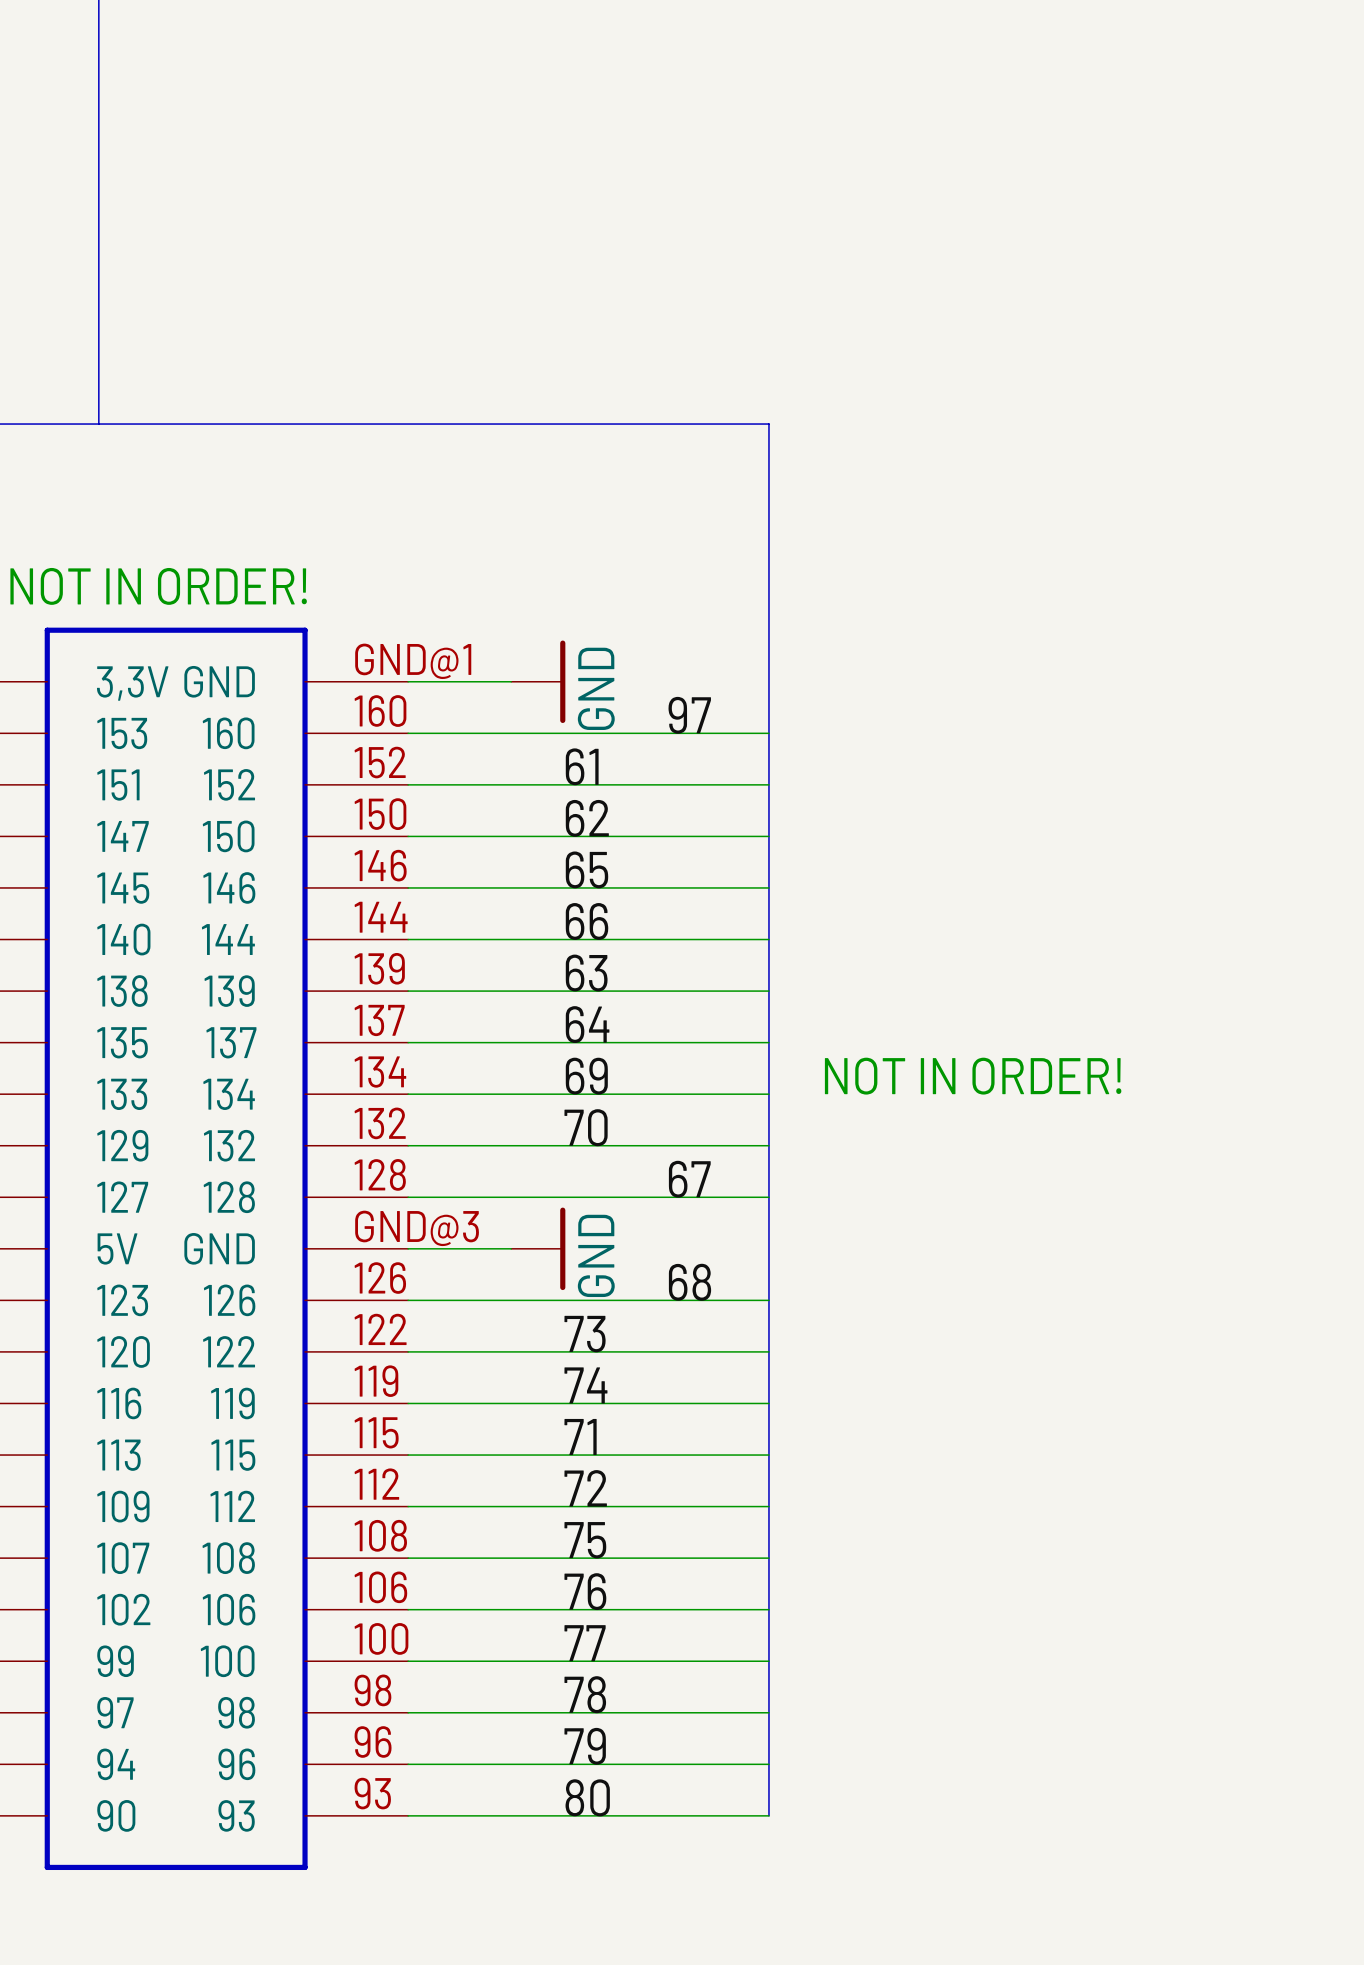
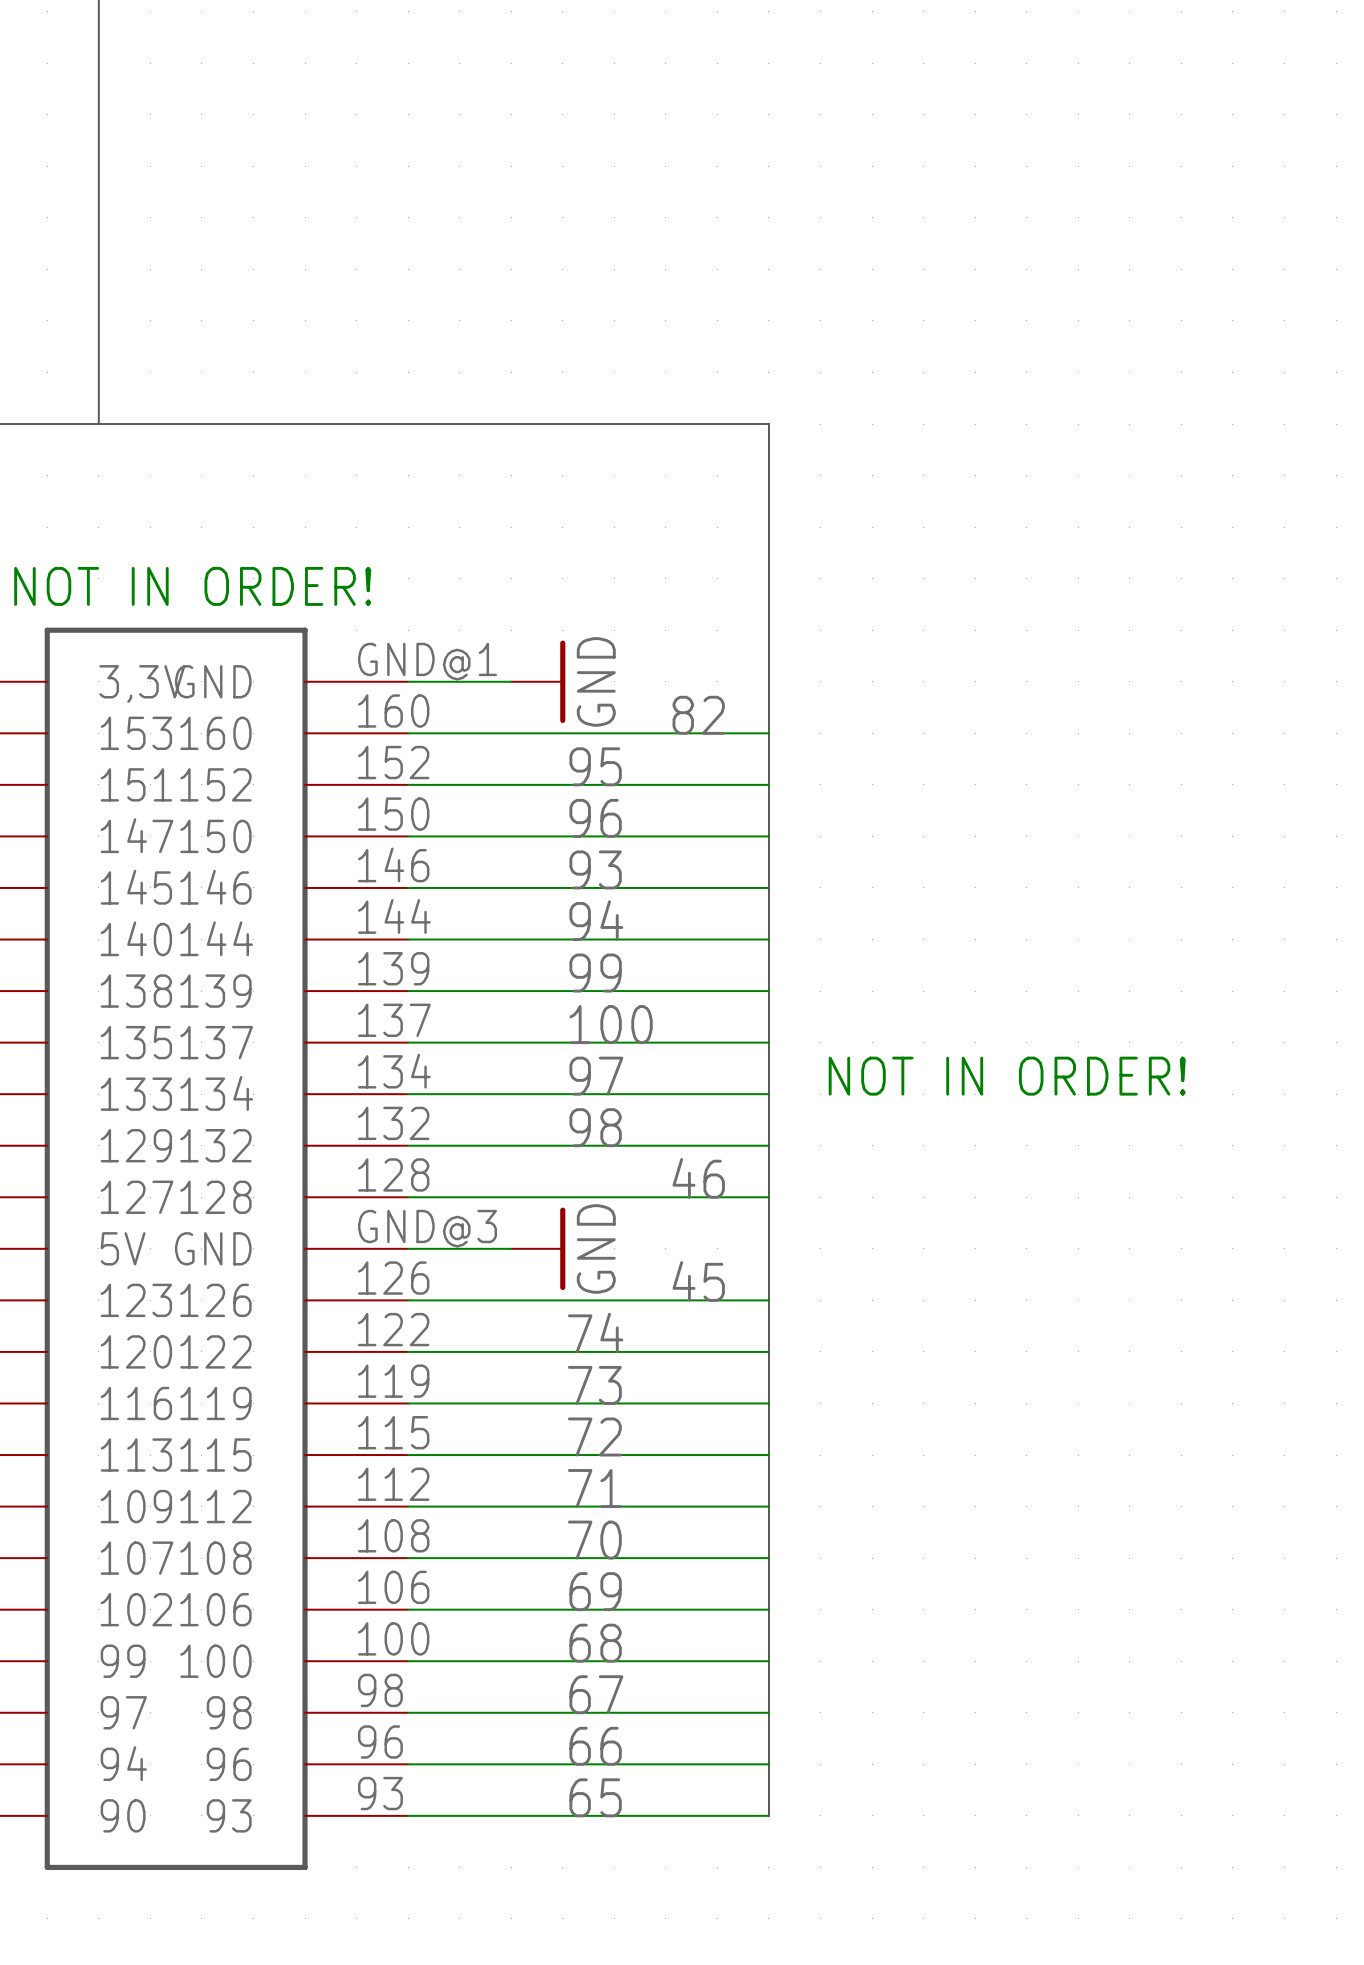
label: 97 (689, 715) -> 82 (698, 715)
label: 61 (582, 766) -> 95 (595, 766)
label: 62 (587, 818) -> 96 (595, 818)
label: 65 (587, 869) -> 93 (595, 869)
label: 66 (587, 921) -> 94 (596, 920)
label: 63 (586, 973) -> 99 (595, 973)
label: 64 (587, 1024) -> 100 (611, 1024)
label: 69 (586, 1076) -> 97 (596, 1076)
label: 70 (586, 1127) -> 98 (595, 1127)
label: 67 (689, 1179) -> 46 (698, 1178)
label: 68 (690, 1282) -> 45 (698, 1281)
label: 73 (585, 1334) -> 74 (595, 1333)
label: 74 (585, 1385) -> 73 (594, 1385)
label: 71 (580, 1436) -> 72 (594, 1436)
label: 72 (585, 1488) -> 71 (594, 1488)
label: 75 (585, 1540) -> 70 (594, 1540)
label: 76 (585, 1591) -> 69 (595, 1591)
label: 77 (585, 1643) -> 68 (595, 1643)
label: 78 (585, 1694) -> 67 (596, 1694)
label: 79 (585, 1746) -> 66 (595, 1746)
label: 80 (587, 1797) -> 65 (595, 1797)

